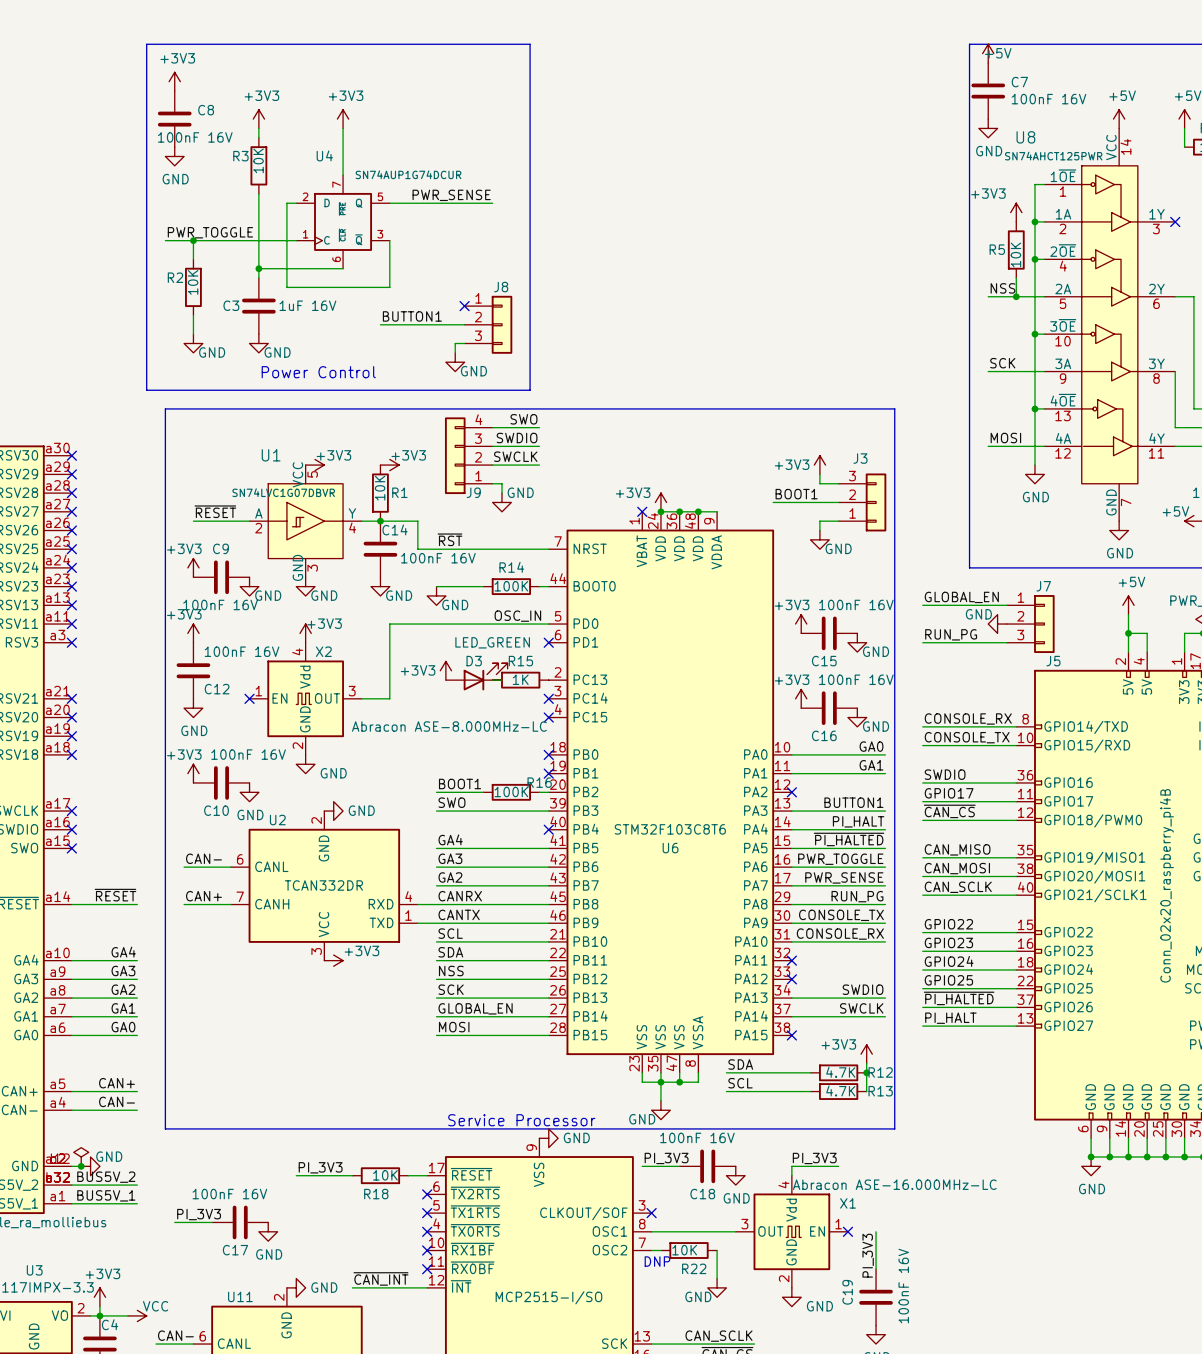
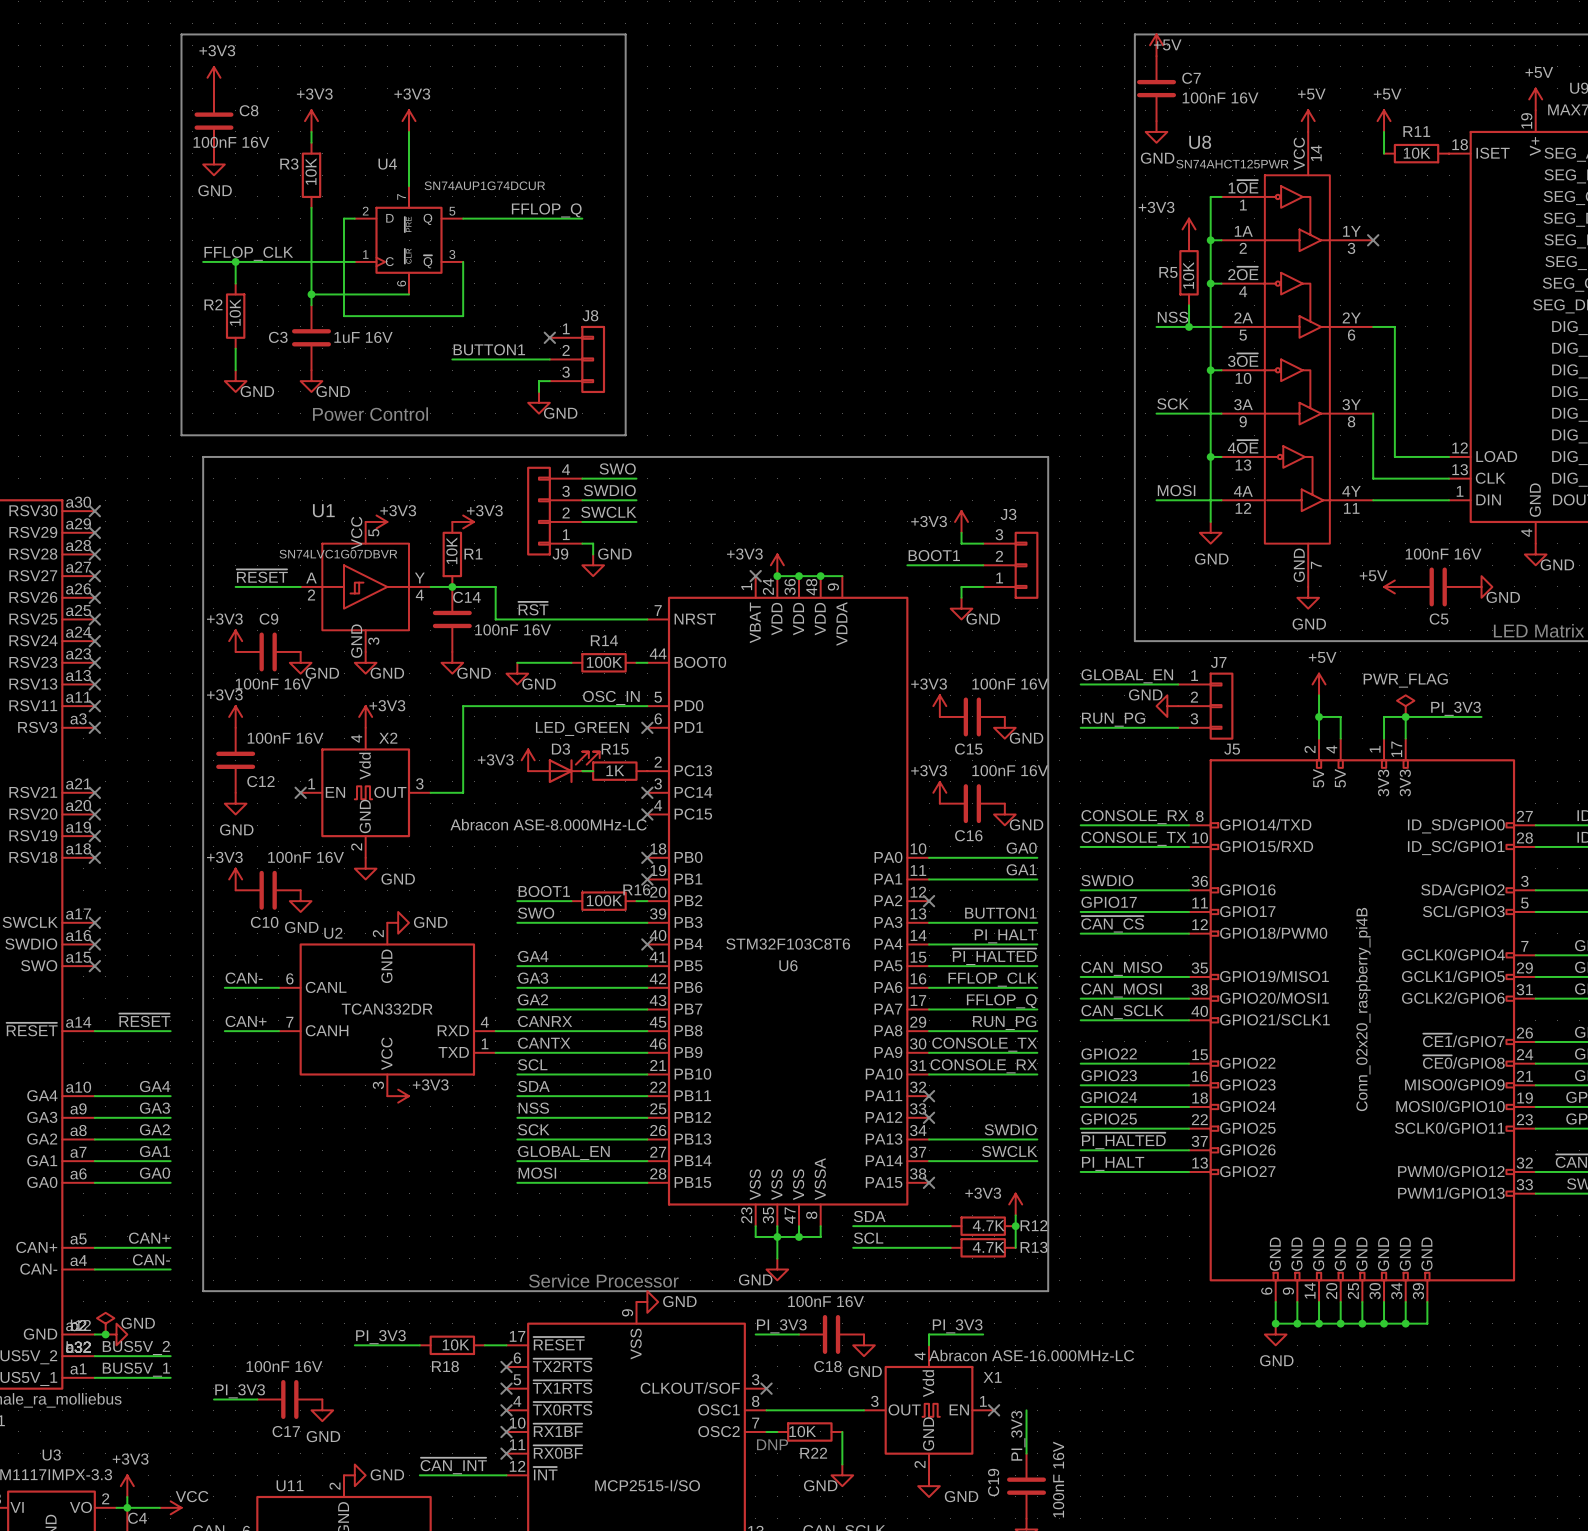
label: PWR_SENSE (451, 195) -> FFLOP_Q (546, 210)
label: PWR_TOGGLE (210, 232) -> FFLOP_CLK (248, 253)
label: PWR_TOGGLE (840, 859) -> FFLOP_CLK (992, 979)
label: PWR_SENSE (844, 877) -> FFLOP_Q (1001, 1001)

